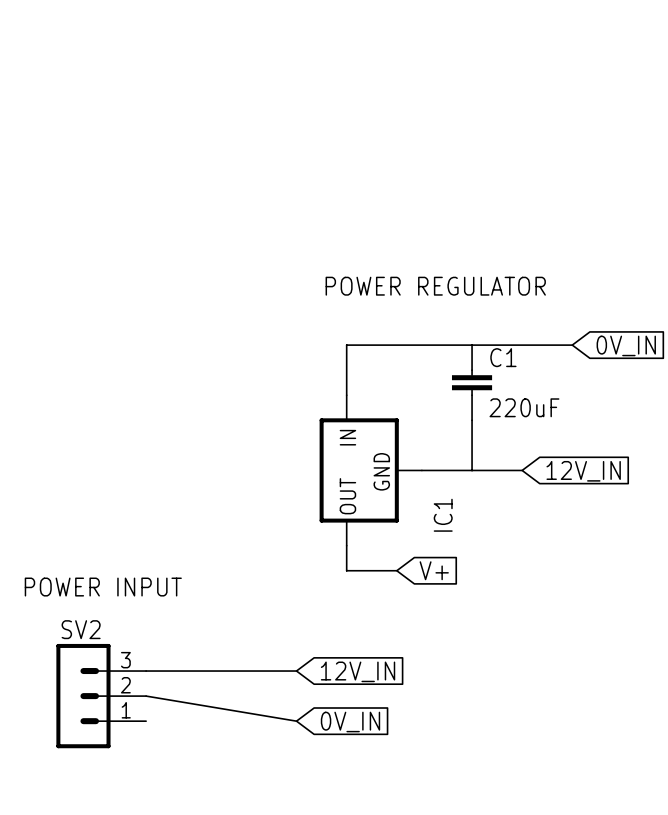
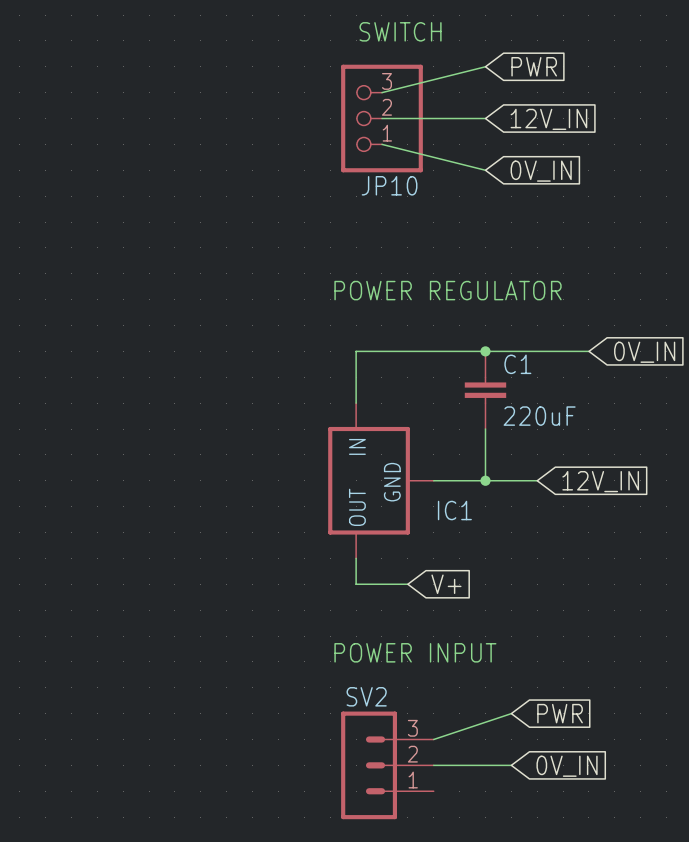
text: none -> SWITCH (400, 31)
wire: none -> (485, 66) (381, 92)
global label: none -> PWR (534, 66)
wire: none -> (381, 118) (485, 118)
JP10: none -> (381, 118)
global label: none -> 12V_IN (548, 119)
wire: none -> (381, 144) (485, 170)
global label: none -> 0V_IN (541, 171)
junction: none -> (485, 351)
junction: none -> (485, 480)
IC1 name rotation: 0° (443, 515) -> 90° clockwise (454, 510)
text: POWER INPUT (103, 587) -> none
text: none -> POWER INPUT (415, 652)
wire: (146, 671) (296, 671) -> none
global label: 12V_IN (358, 671) -> none
SV2 position: (101, 696) -> (387, 765)
wire: (146, 696) (296, 721) -> none
wire: none -> (511, 713) (433, 739)
global label: none -> PWR (560, 713)
global label position: 0V_IN (350, 722) -> 0V_IN (567, 766)
wire: none -> (433, 765) (511, 765)

